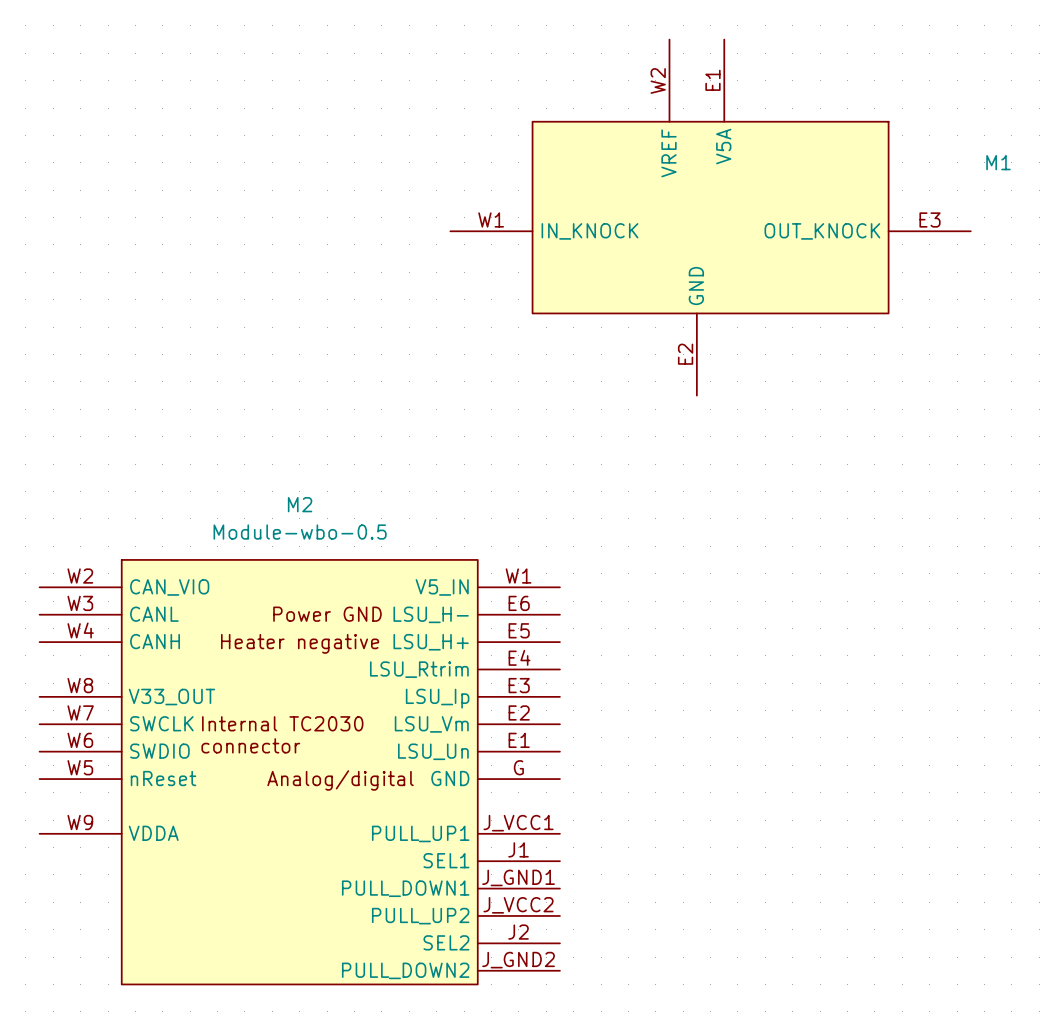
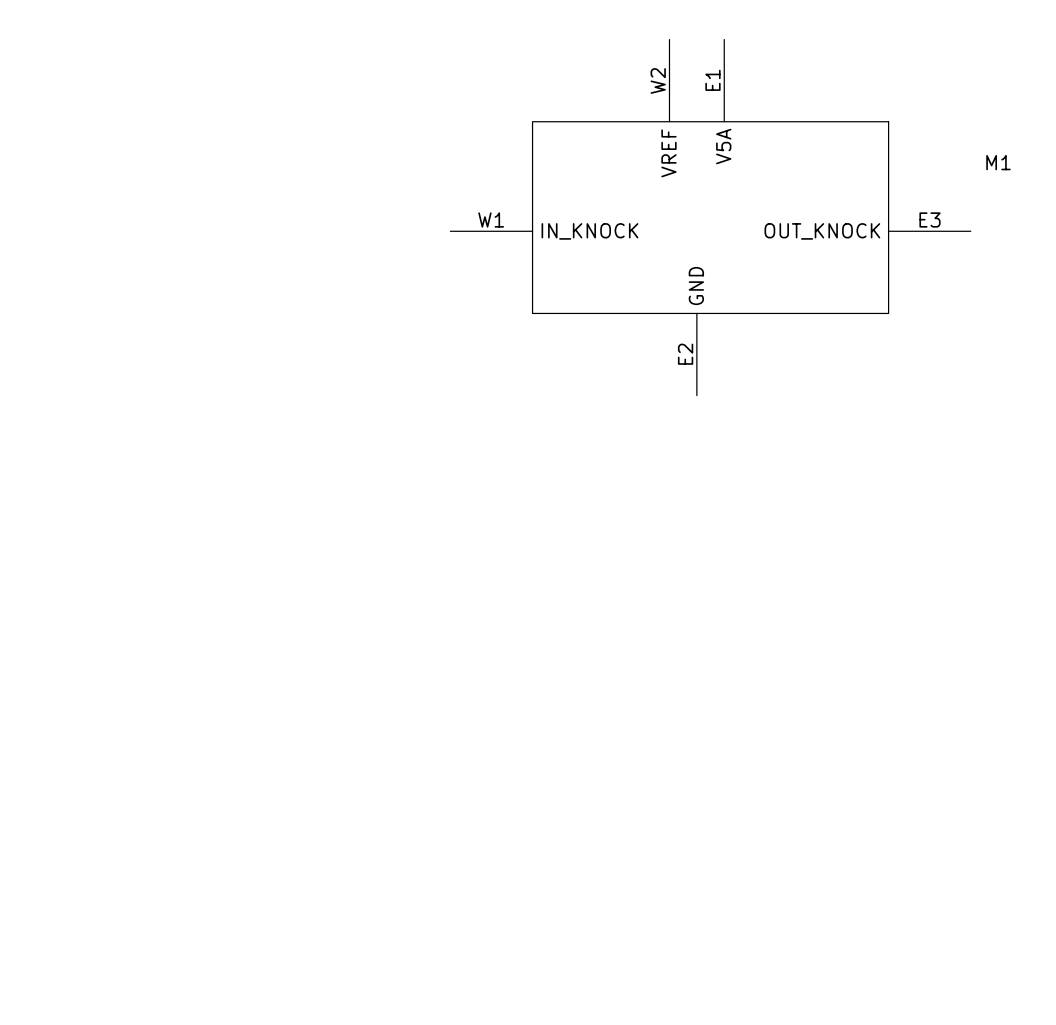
M2: Module-wbo-0.5 (299, 772) -> none

